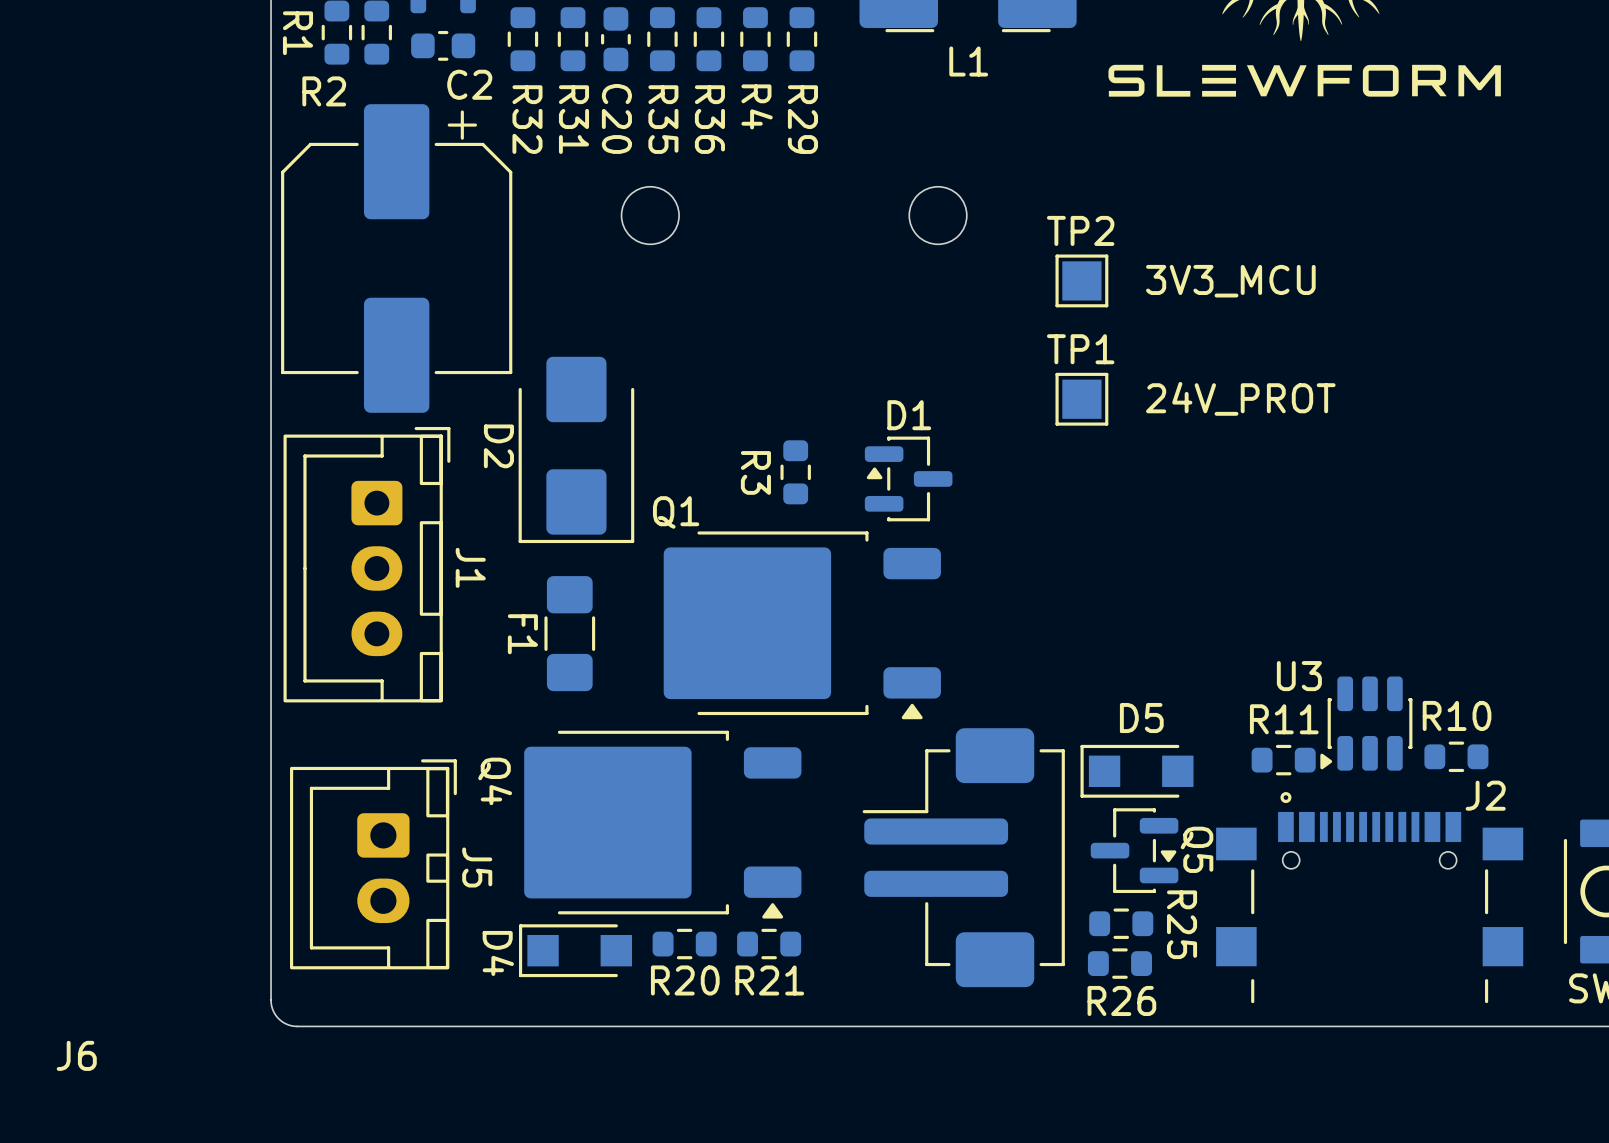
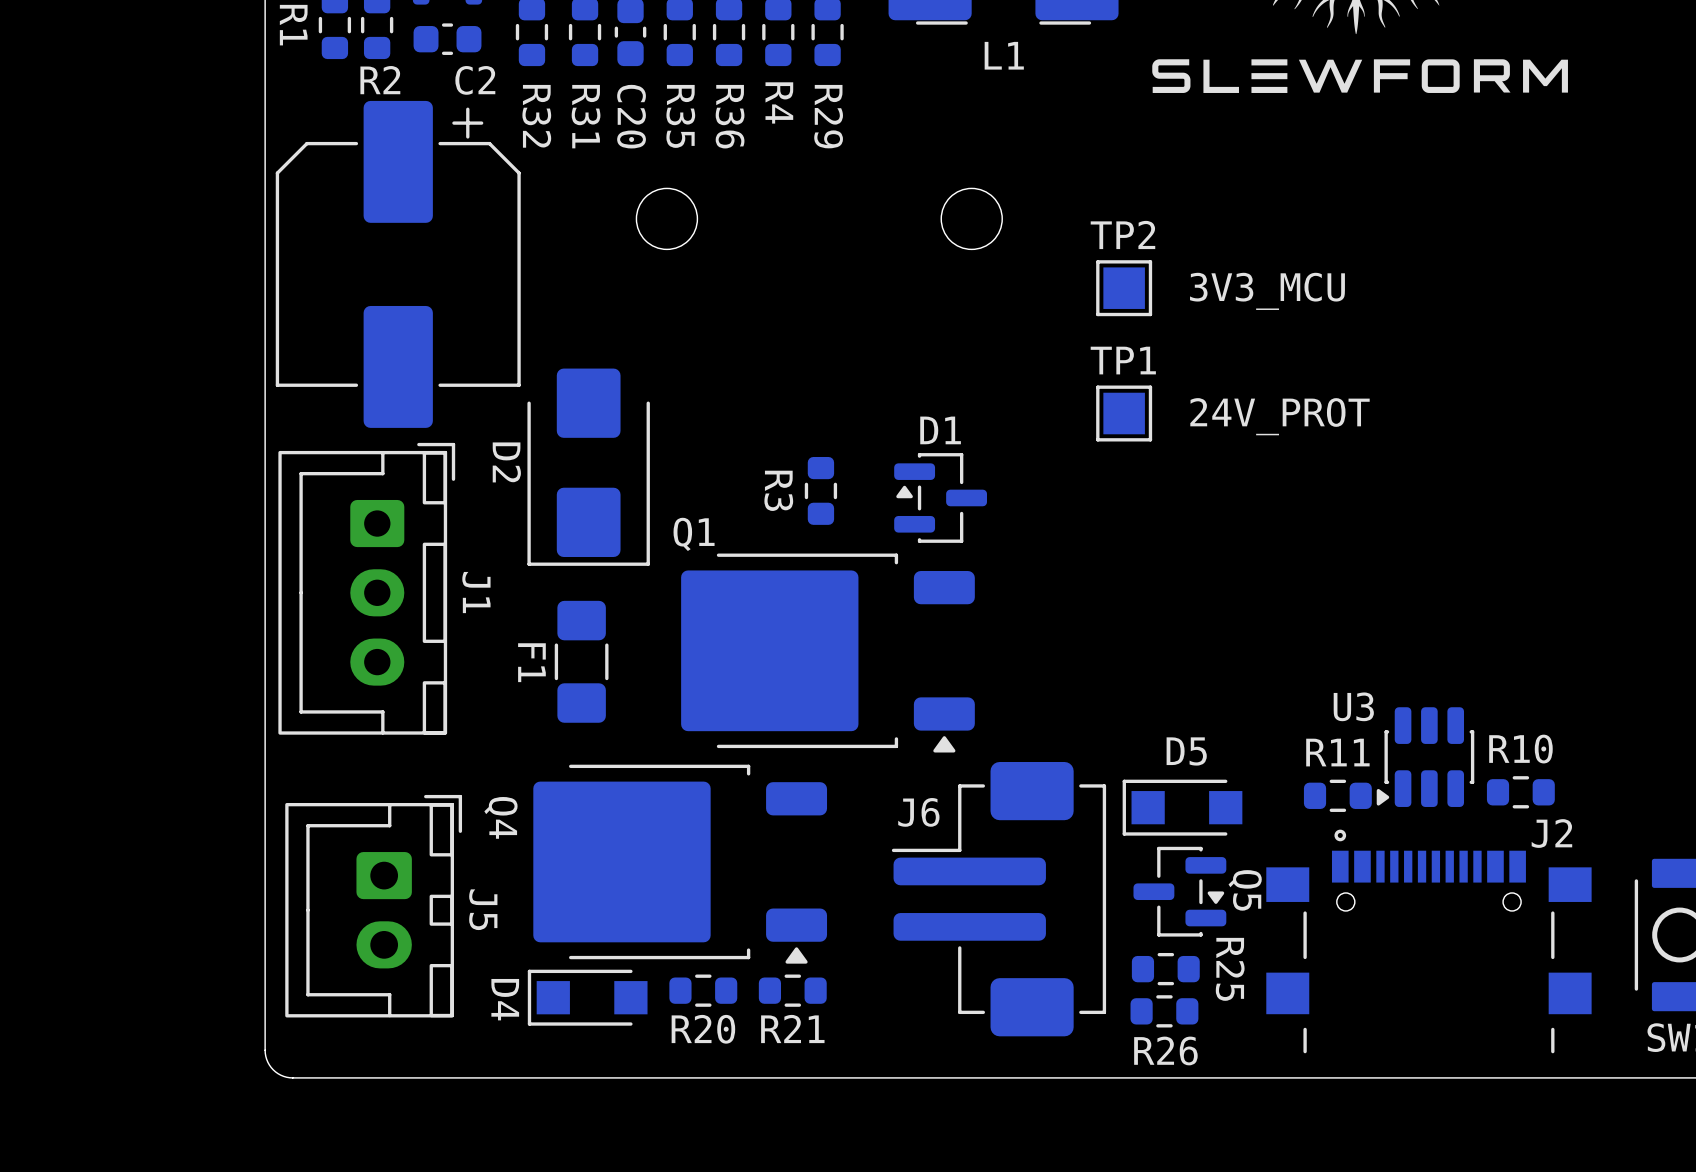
R2 name position: R2 (324, 91) -> R2 (380, 80)
J6 name position: J6 (76, 1055) -> J6 (918, 812)

